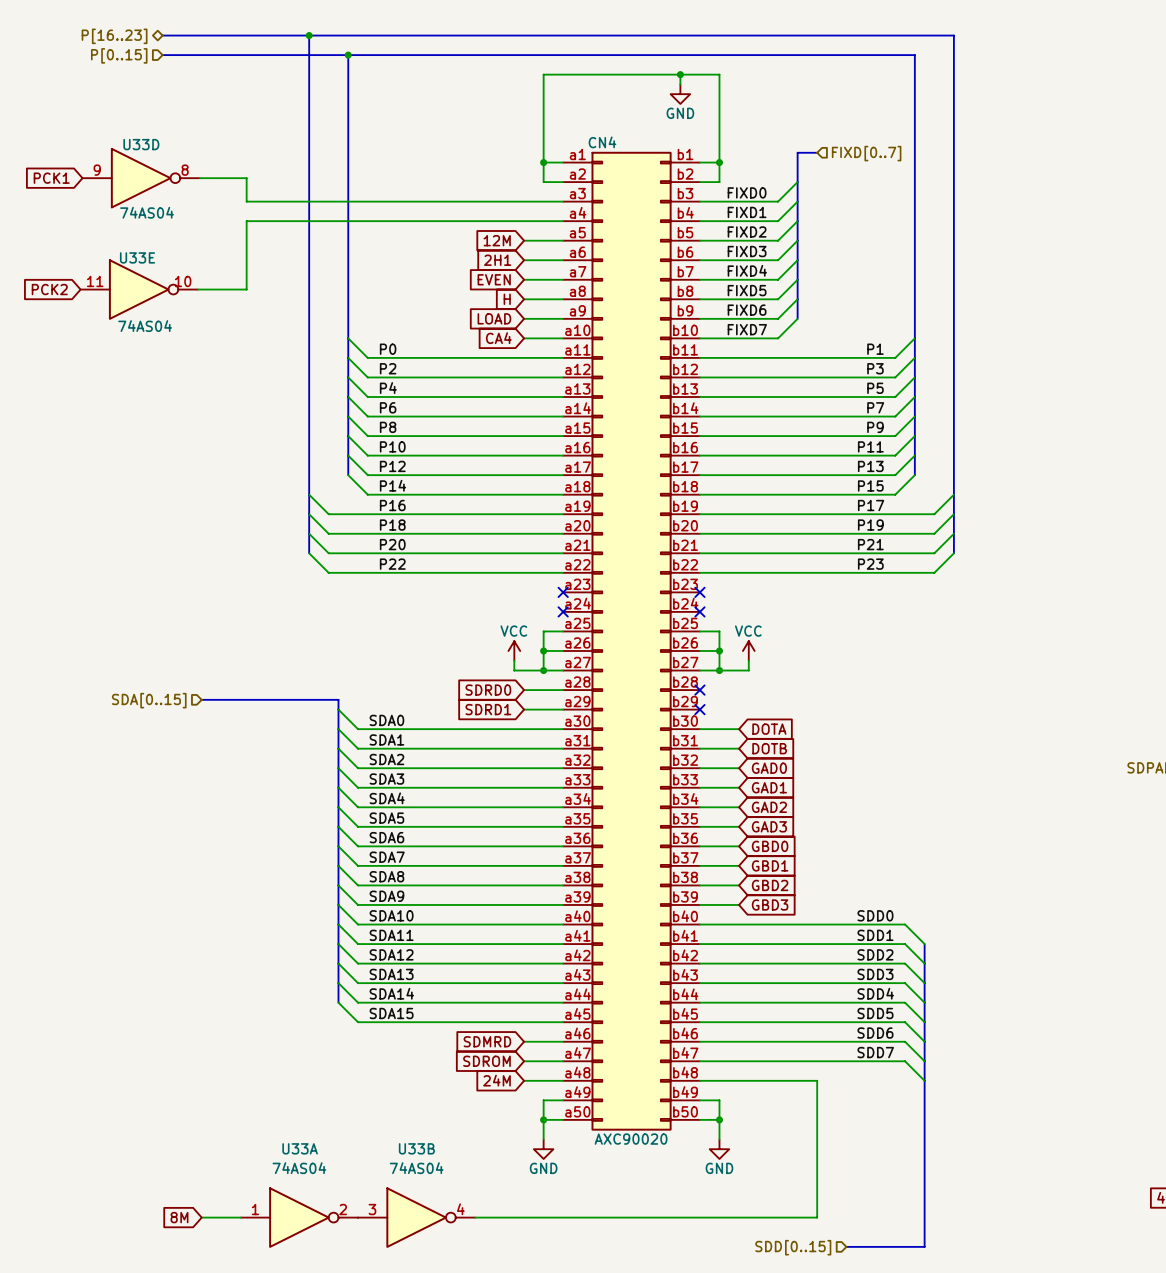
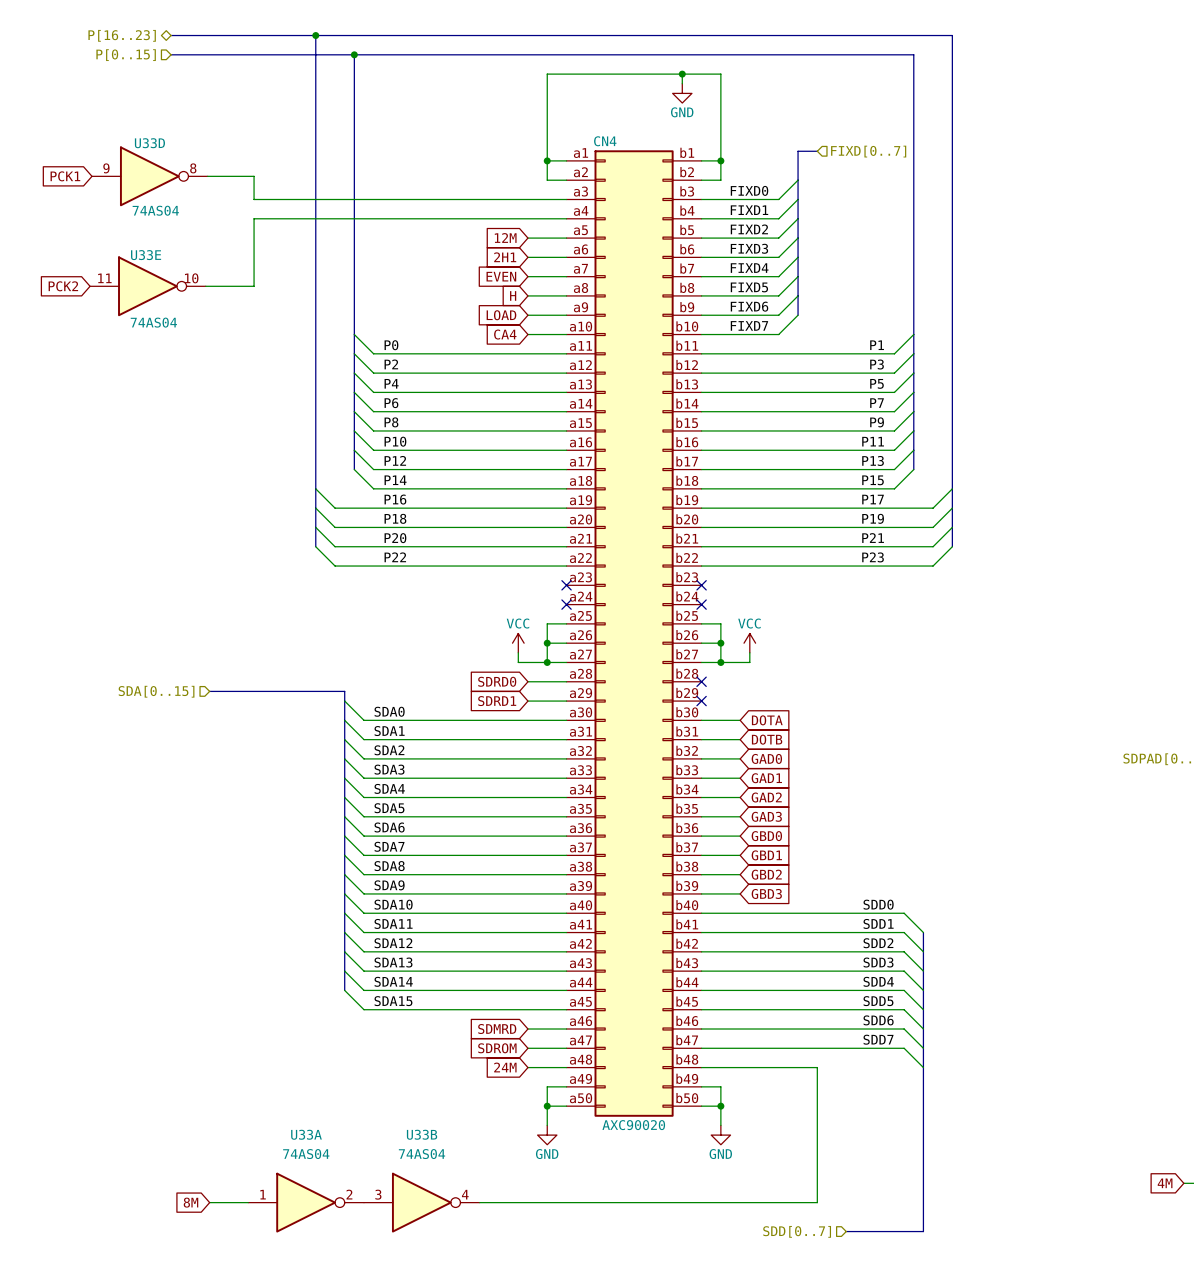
hierarchical label: SDD[0..15] (793, 1247) -> SDD[0..7] (797, 1231)

